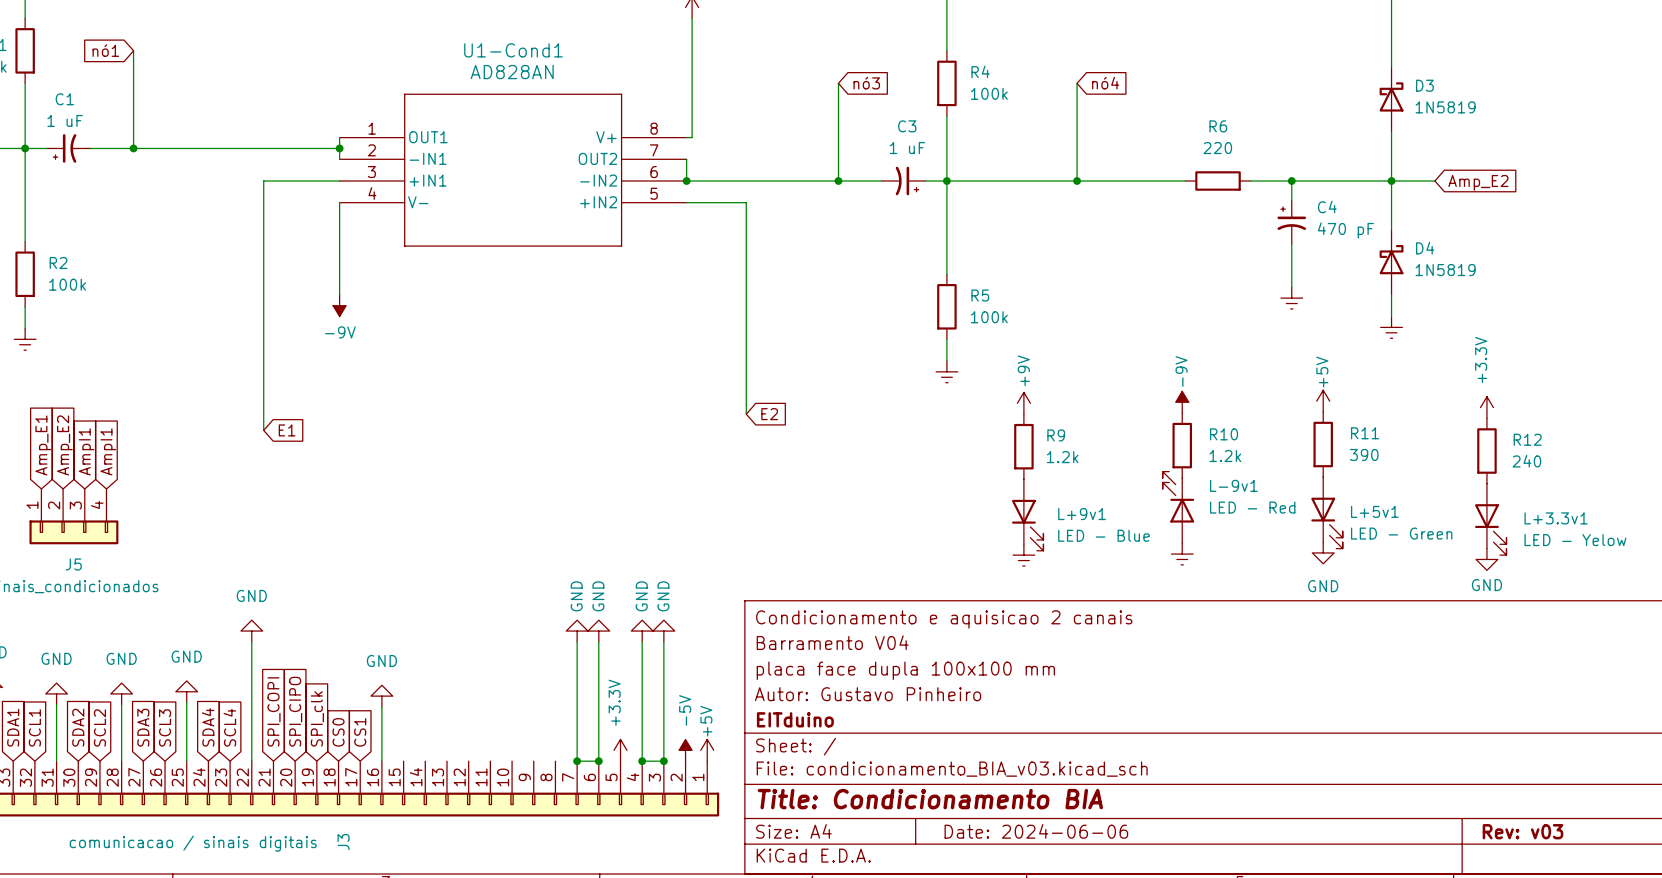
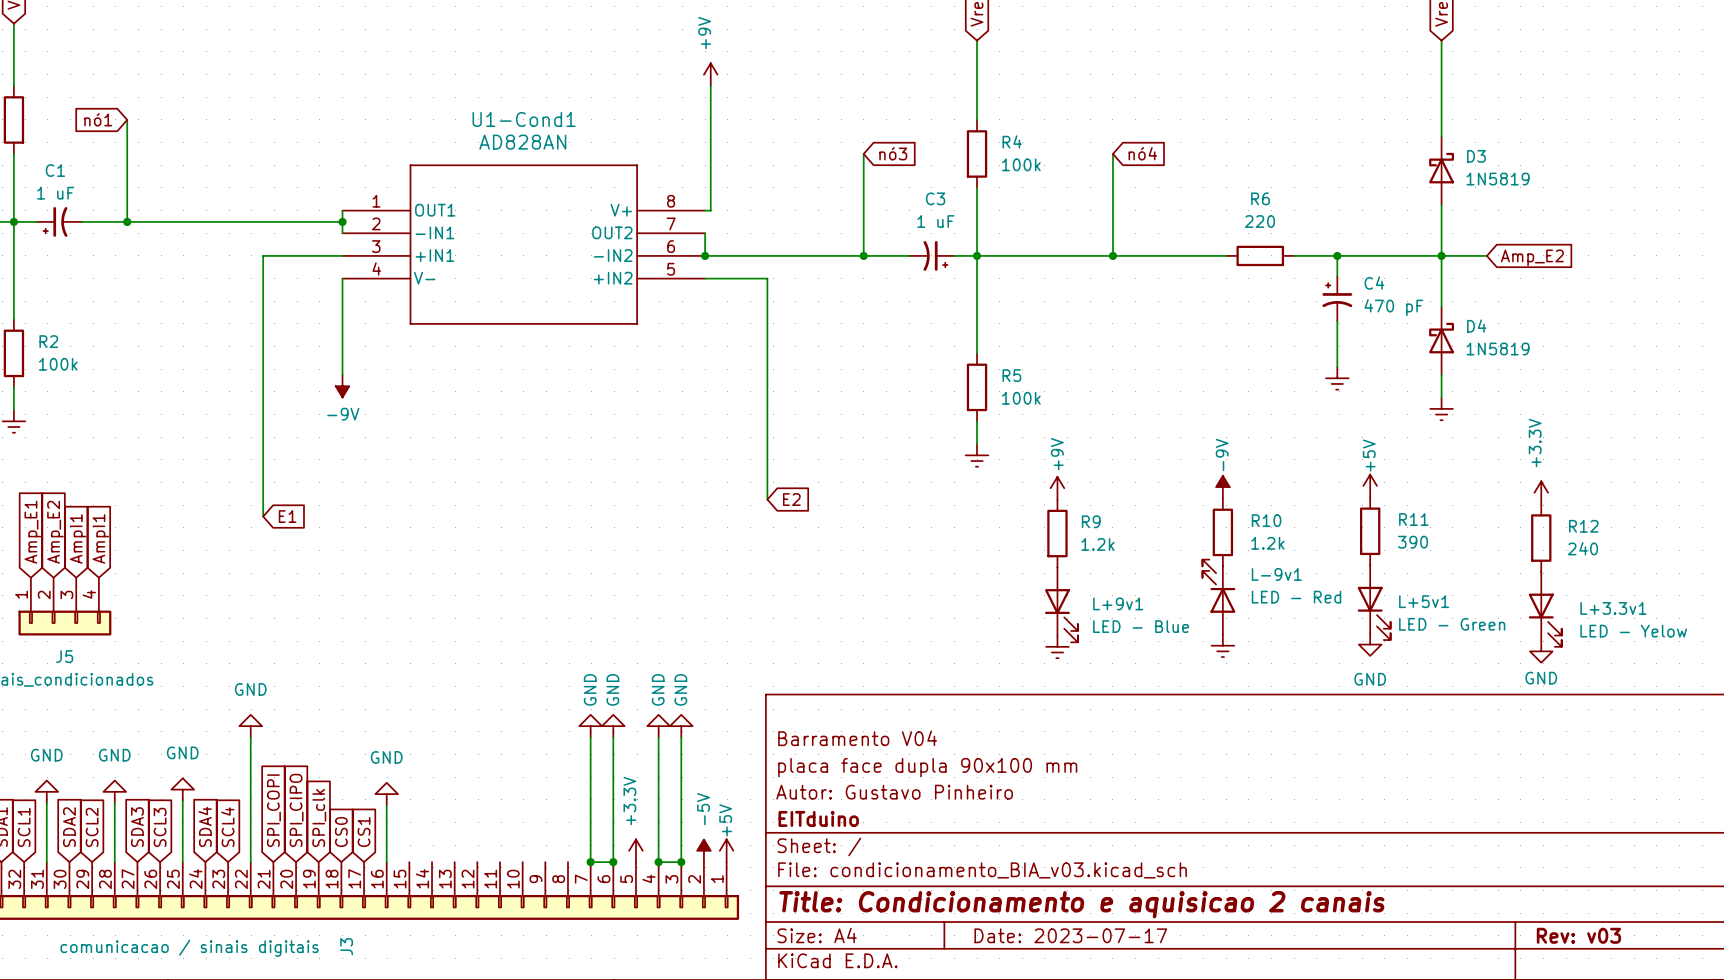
title block: Condicionamento e aquisicao 2 canais (944, 619) -> none
title block: placa face dupla 100x100 mm (905, 670) -> placa face dupla 90x100 mm (927, 767)
title block: Title: Condicionamento BIA (930, 799) -> Title: Condicionamento e aquisicao 2 canais (1081, 904)
title block: Date: 2024-06-06 (1036, 831) -> Date: 2023-07-17 (1070, 935)

